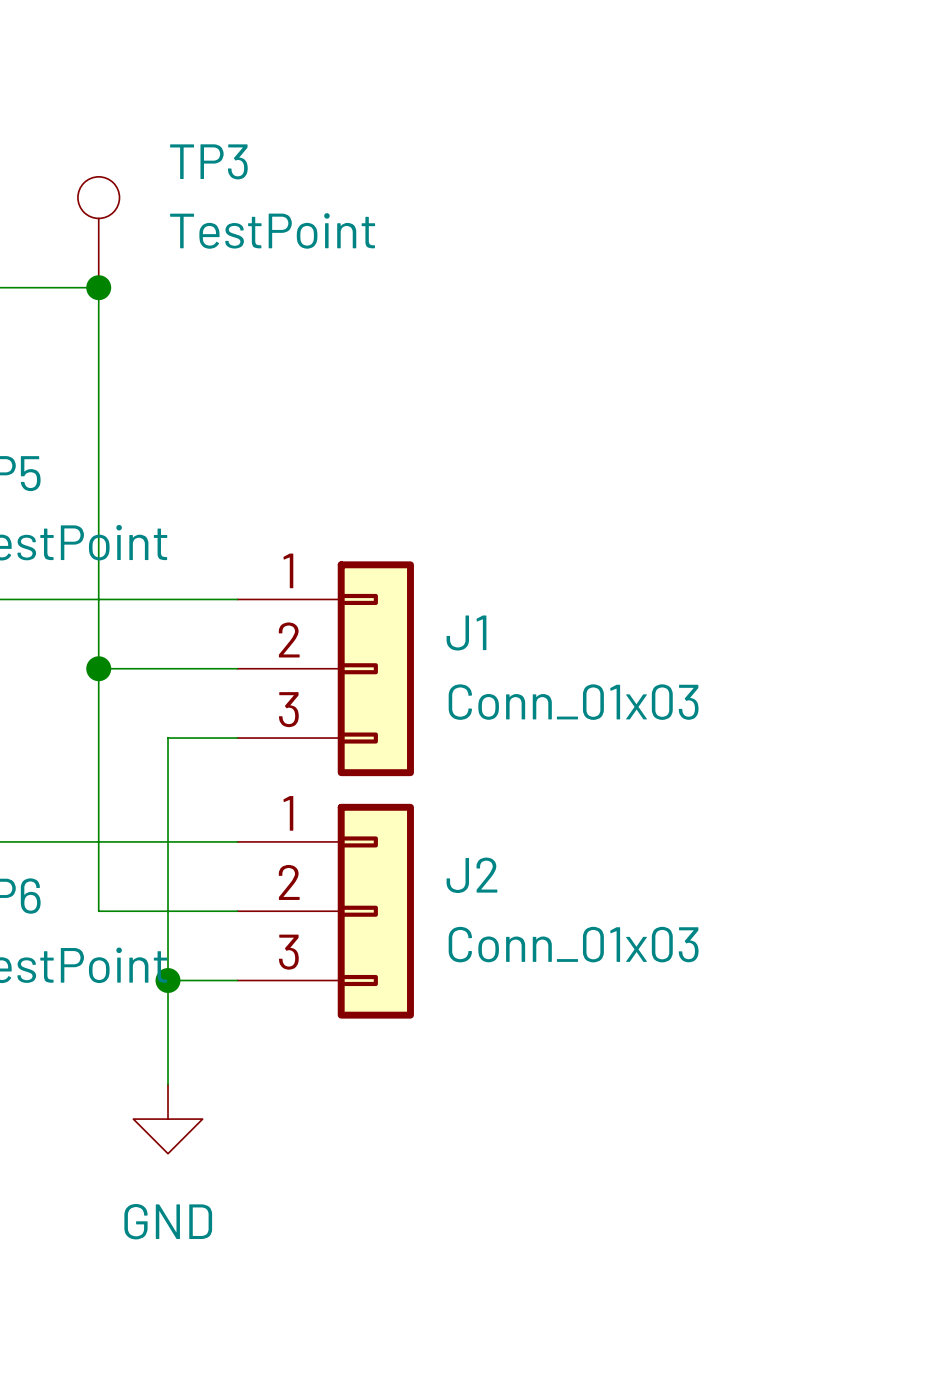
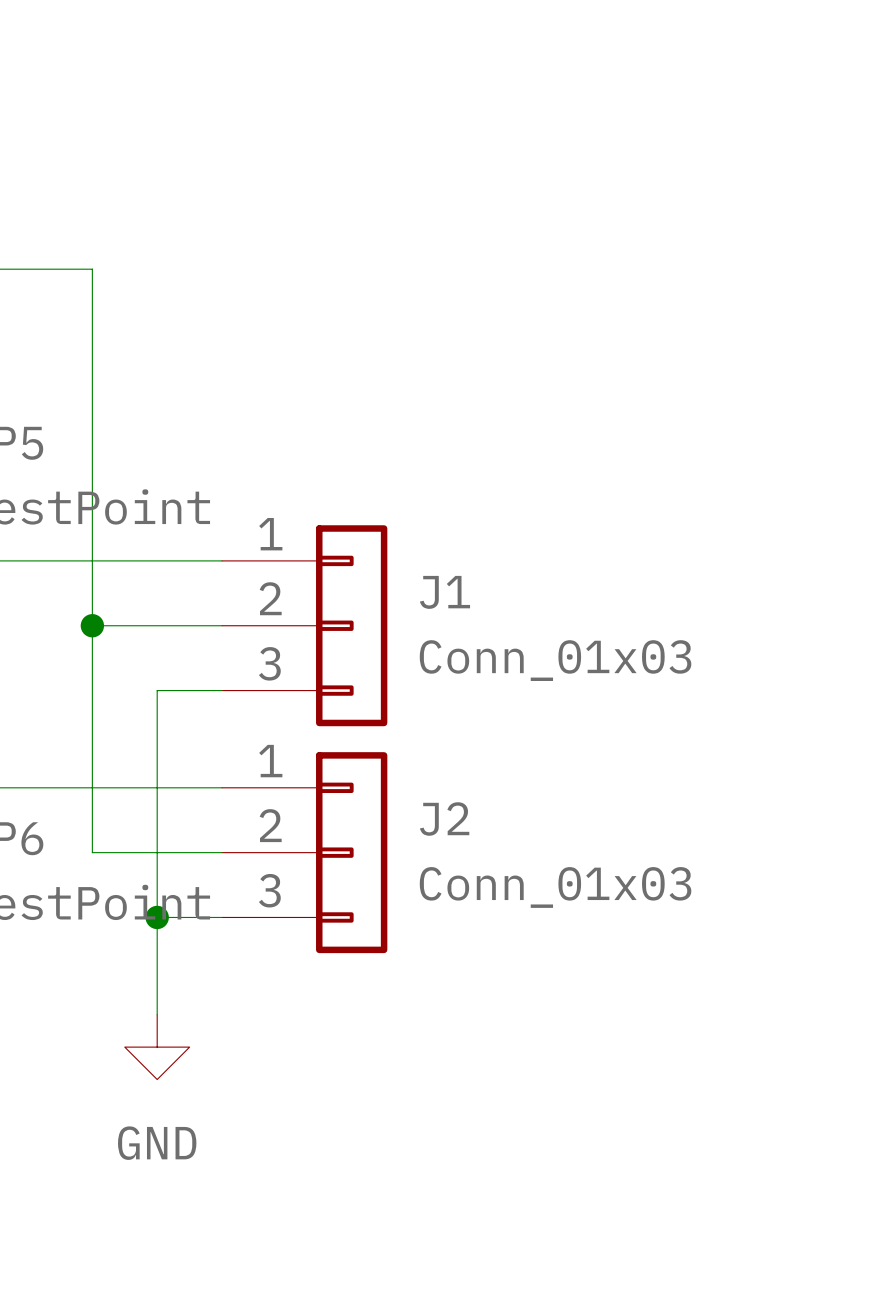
TP3: TestPoint (98, 232) -> none
junction: (98, 287) -> none

